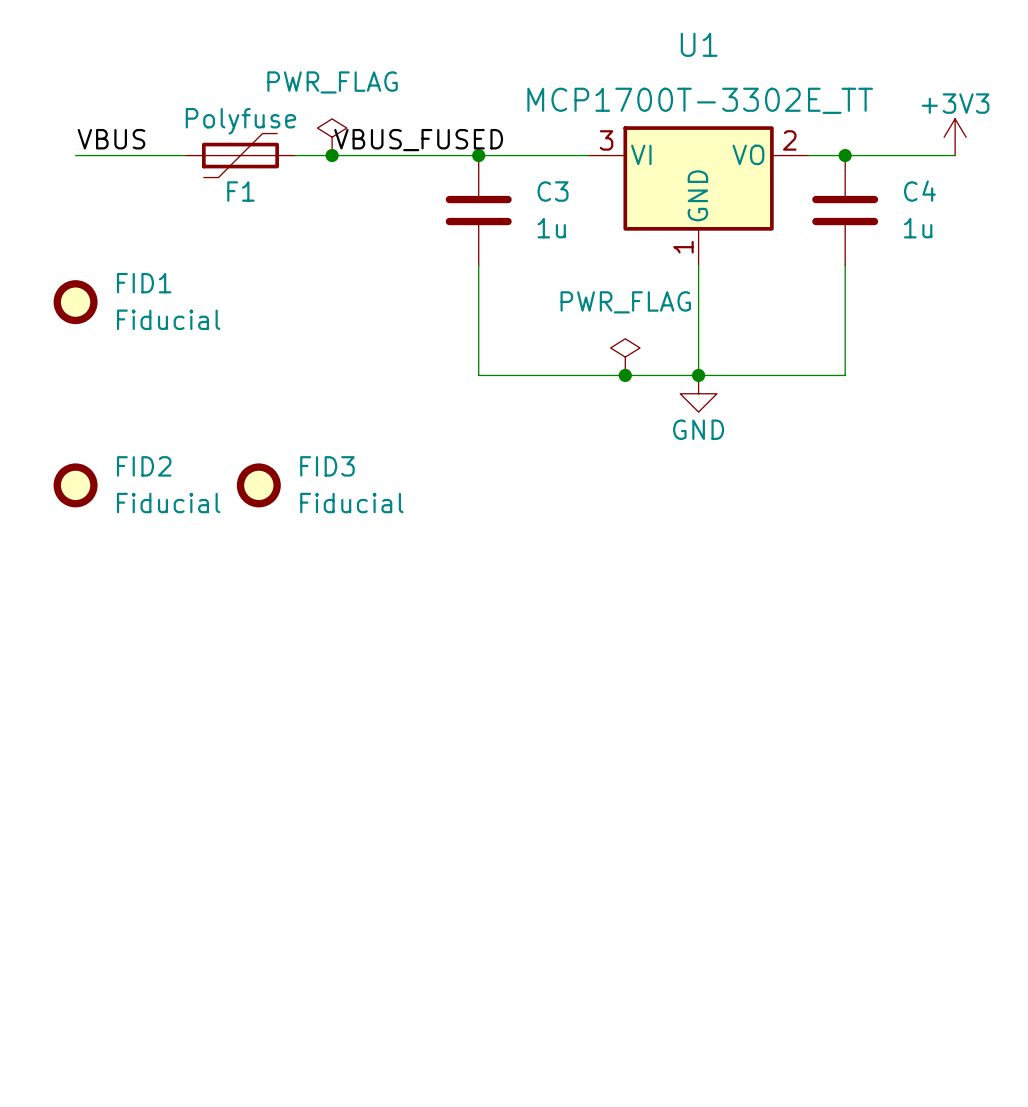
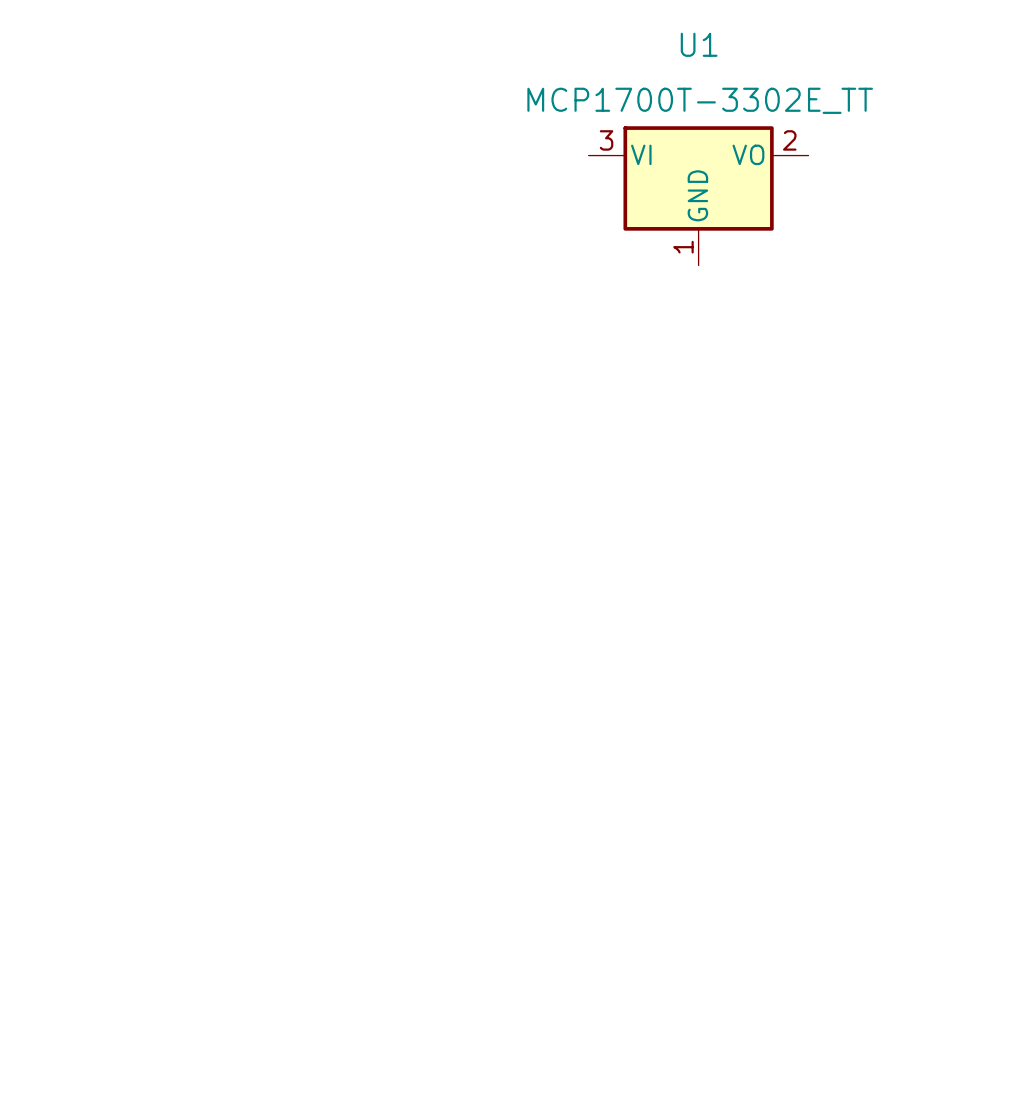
power symbol: PWR_FLAG (332, 137) -> none
power symbol: +3V3 (955, 137) -> none
label: VBUS (111, 139) -> none
label: VBUS_FUSED (418, 140) -> none
wire: (75, 155) (185, 155) -> none
F1: Polyfuse (240, 155) -> none
wire: (295, 155) (588, 155) -> none
junction: (332, 155) -> none
junction: (478, 155) -> none
wire: (808, 155) (955, 155) -> none
junction: (845, 155) -> none
C3: 1u (478, 210) -> none
C4: 1u (845, 210) -> none
wire: (478, 265) (478, 375) (845, 375) (845, 265) -> none
wire: (698, 265) (698, 375) -> none
FID1: Fiducial (75, 302) -> none
power symbol: PWR_FLAG (625, 357) -> none
junction: (625, 375) -> none
junction: (698, 375) -> none
power symbol: GND (698, 393) -> none
FID2: Fiducial (75, 485) -> none
FID3: Fiducial (258, 485) -> none

